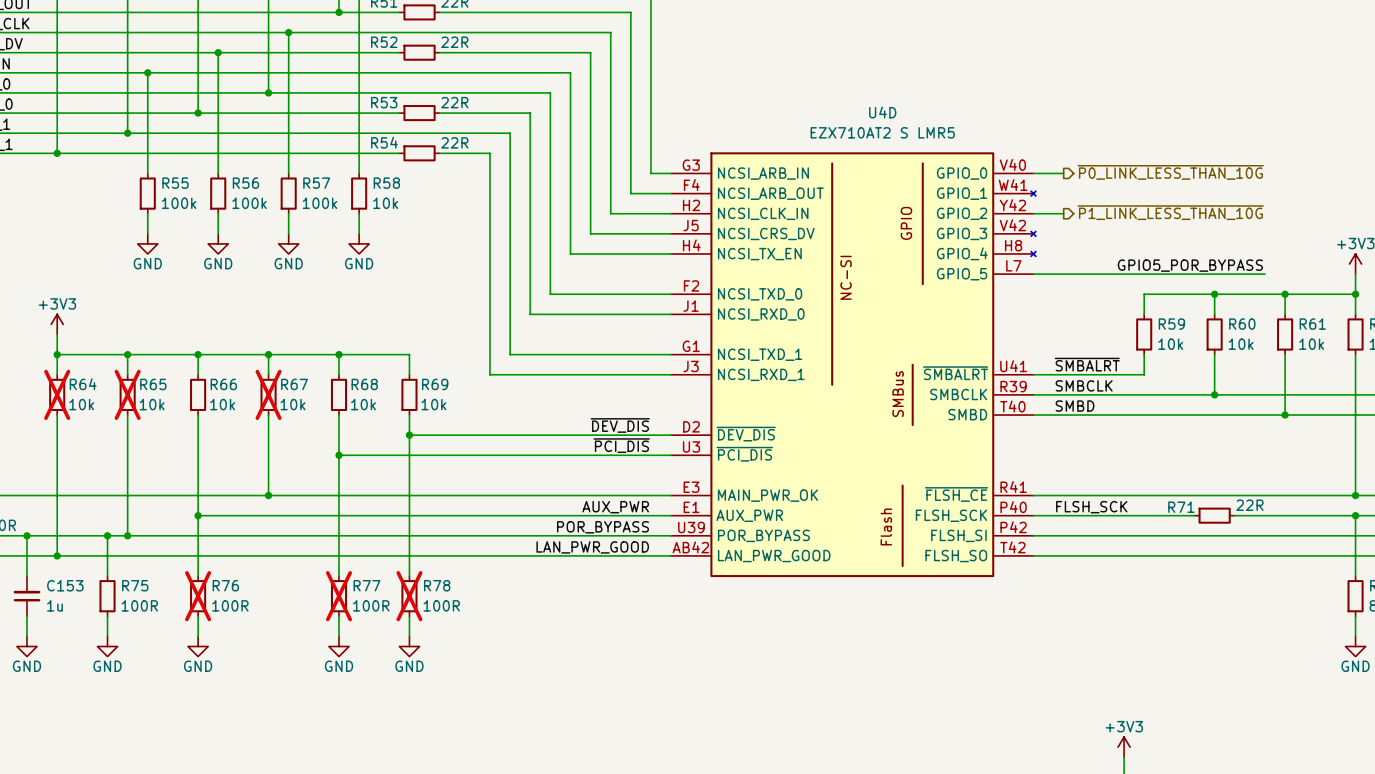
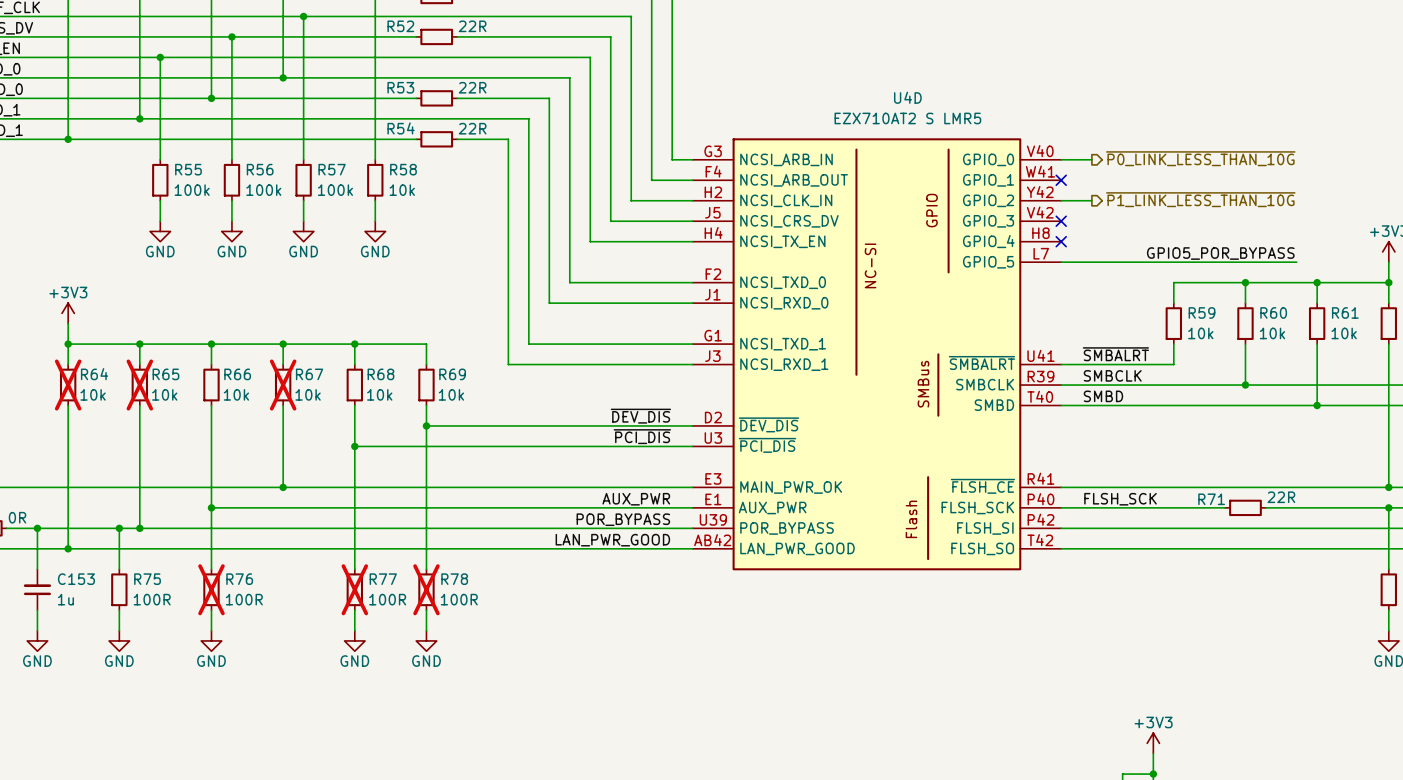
U4D symbol: [671, 152, 1036, 578] -> [692, 138, 1062, 571]
no-connect mark: none -> (1061, 180)
no-connect mark: none -> (1061, 221)
no-connect mark: none -> (1061, 241)

